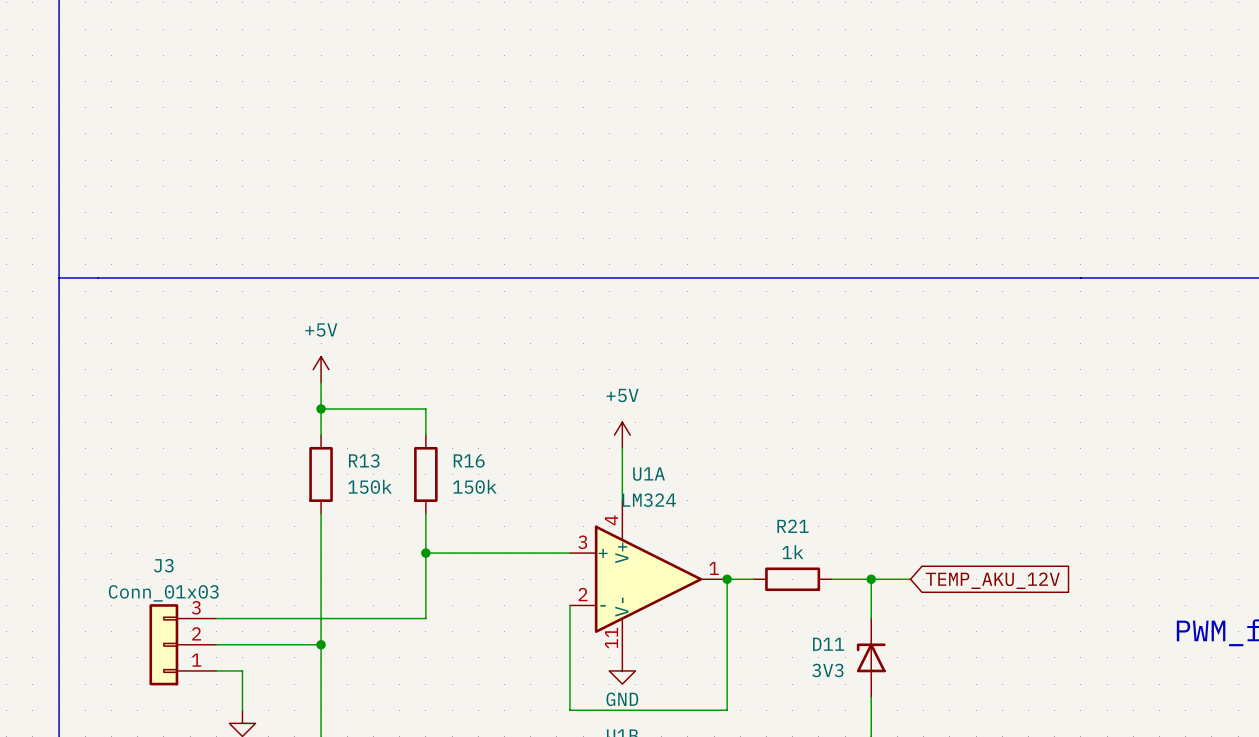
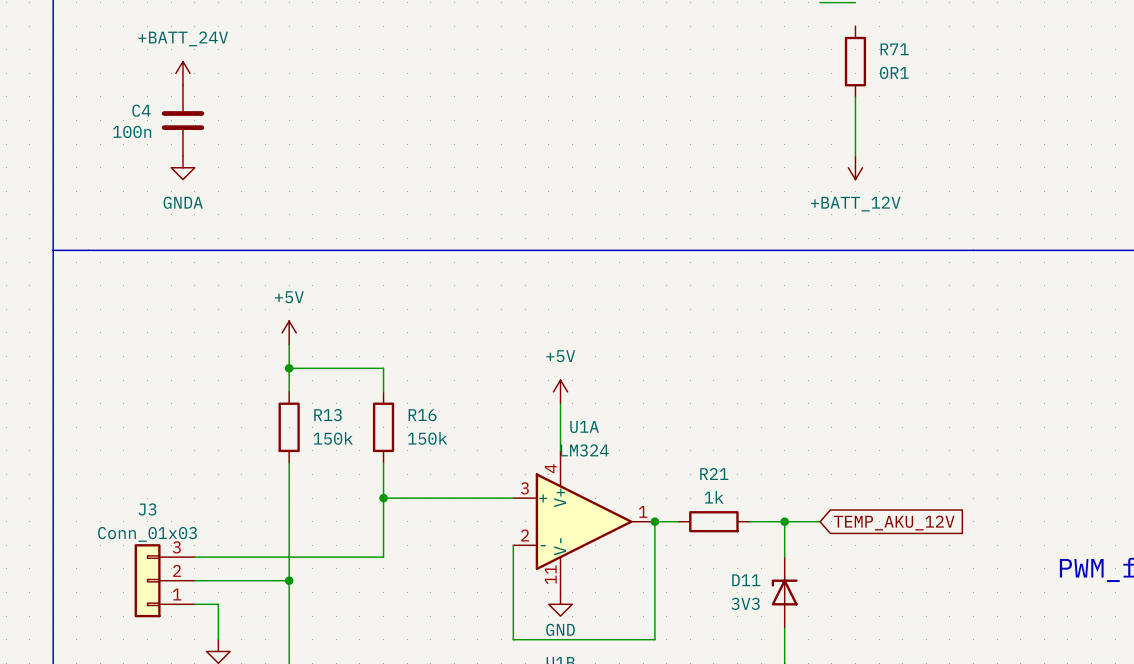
wire: none -> (820, 2) (855, 2)
R71: none -> 0R1 (855, 61)
power symbol: none -> +BATT_24V (182, 73)
wire: none -> (855, 96) (855, 155)
C4: none -> 100n (182, 120)
power symbol: none -> GNDA (182, 167)
power symbol: none -> +BATT_12V (855, 167)

